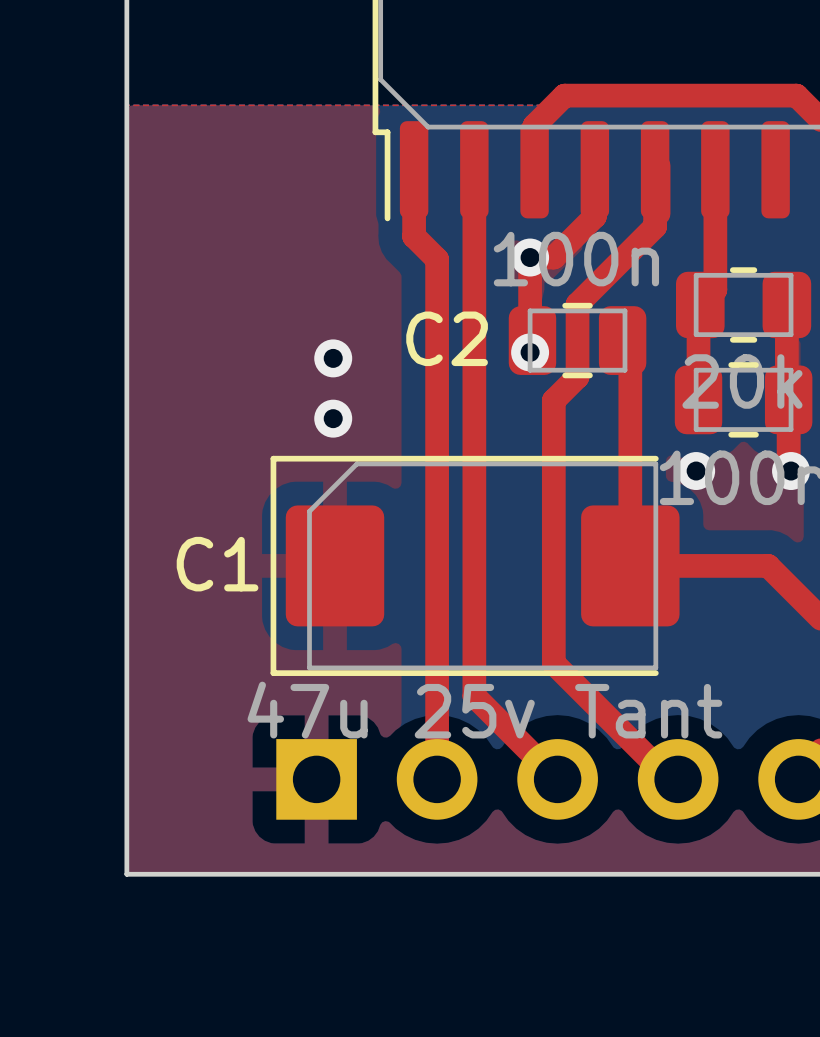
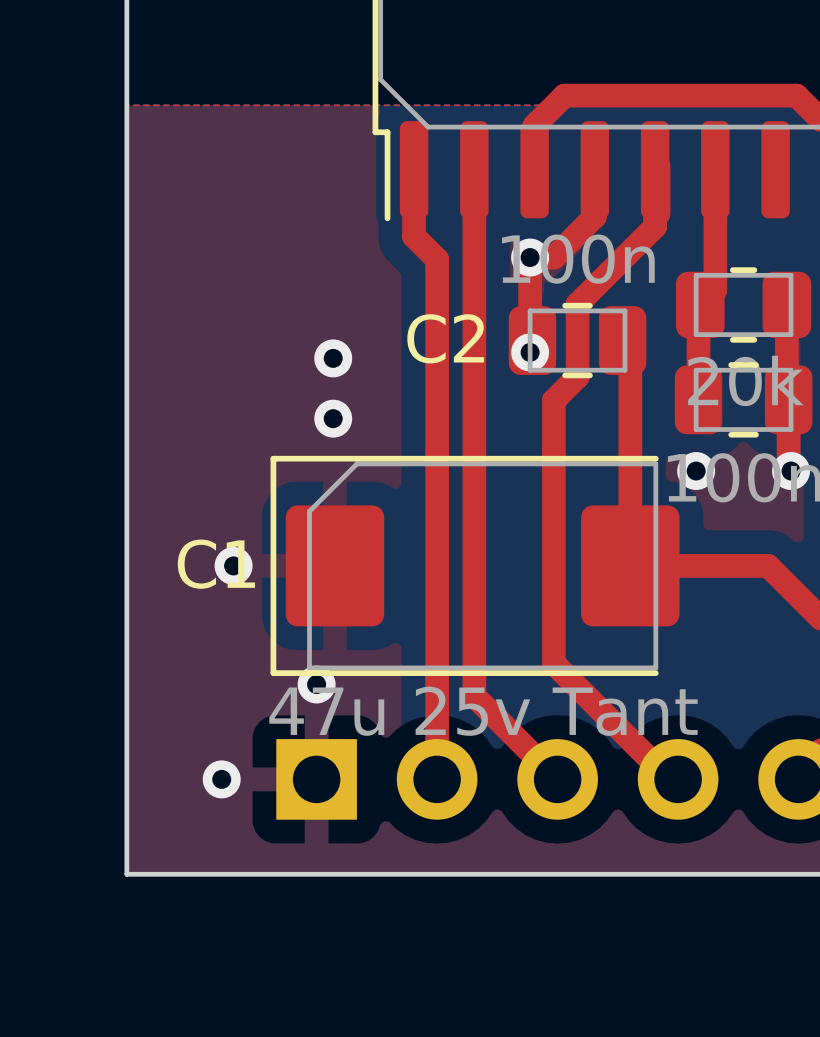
via: none -> (233, 565)
via: none -> (316, 684)
via: none -> (221, 779)

